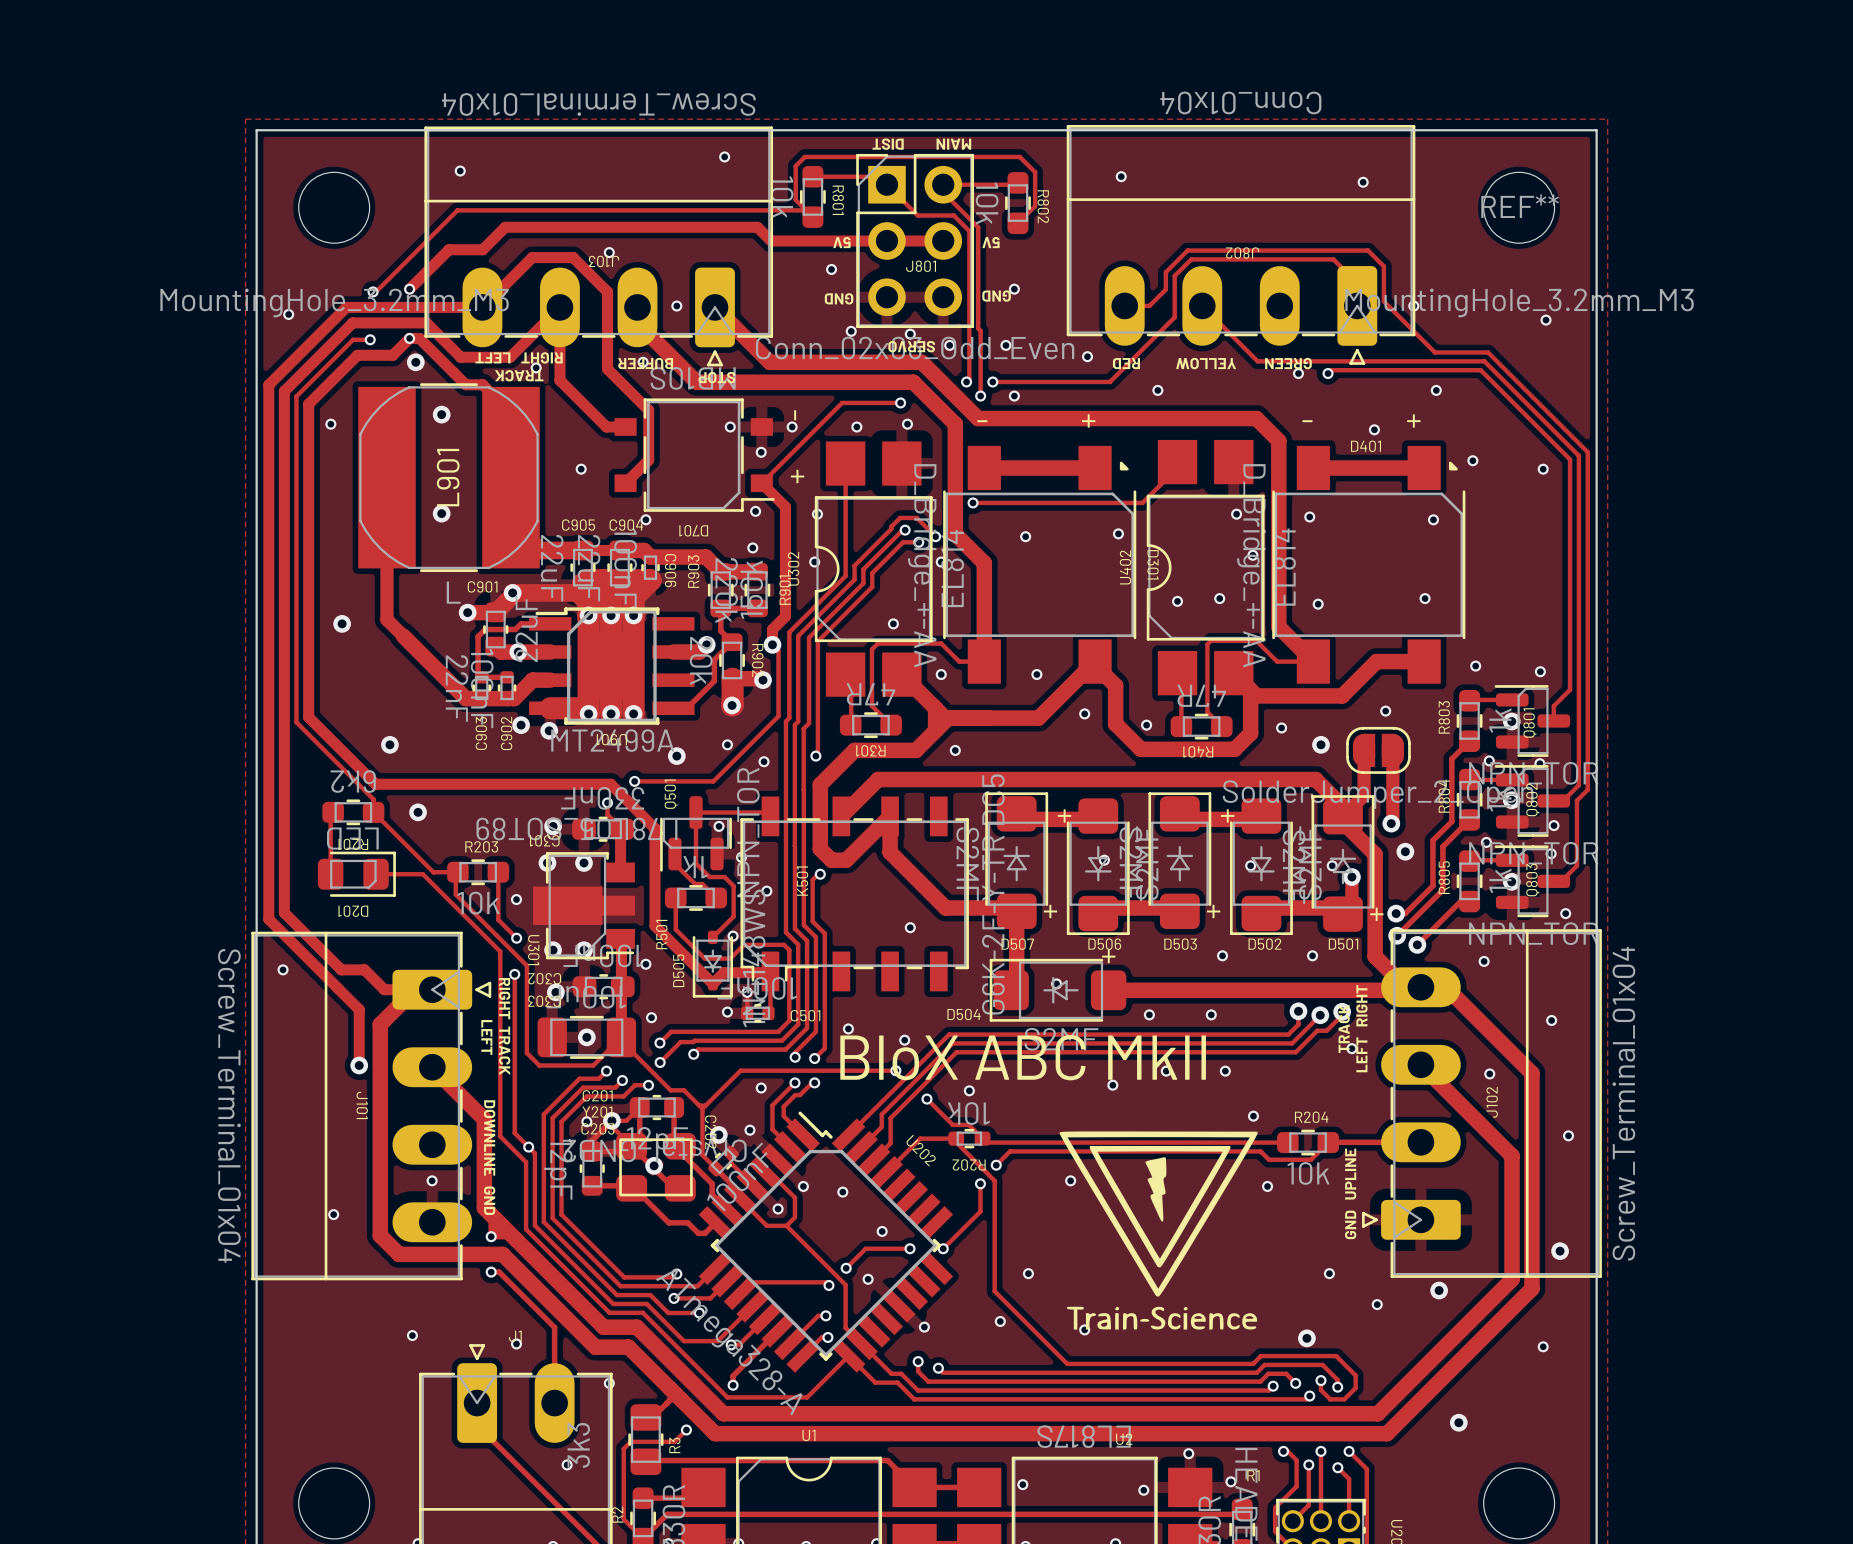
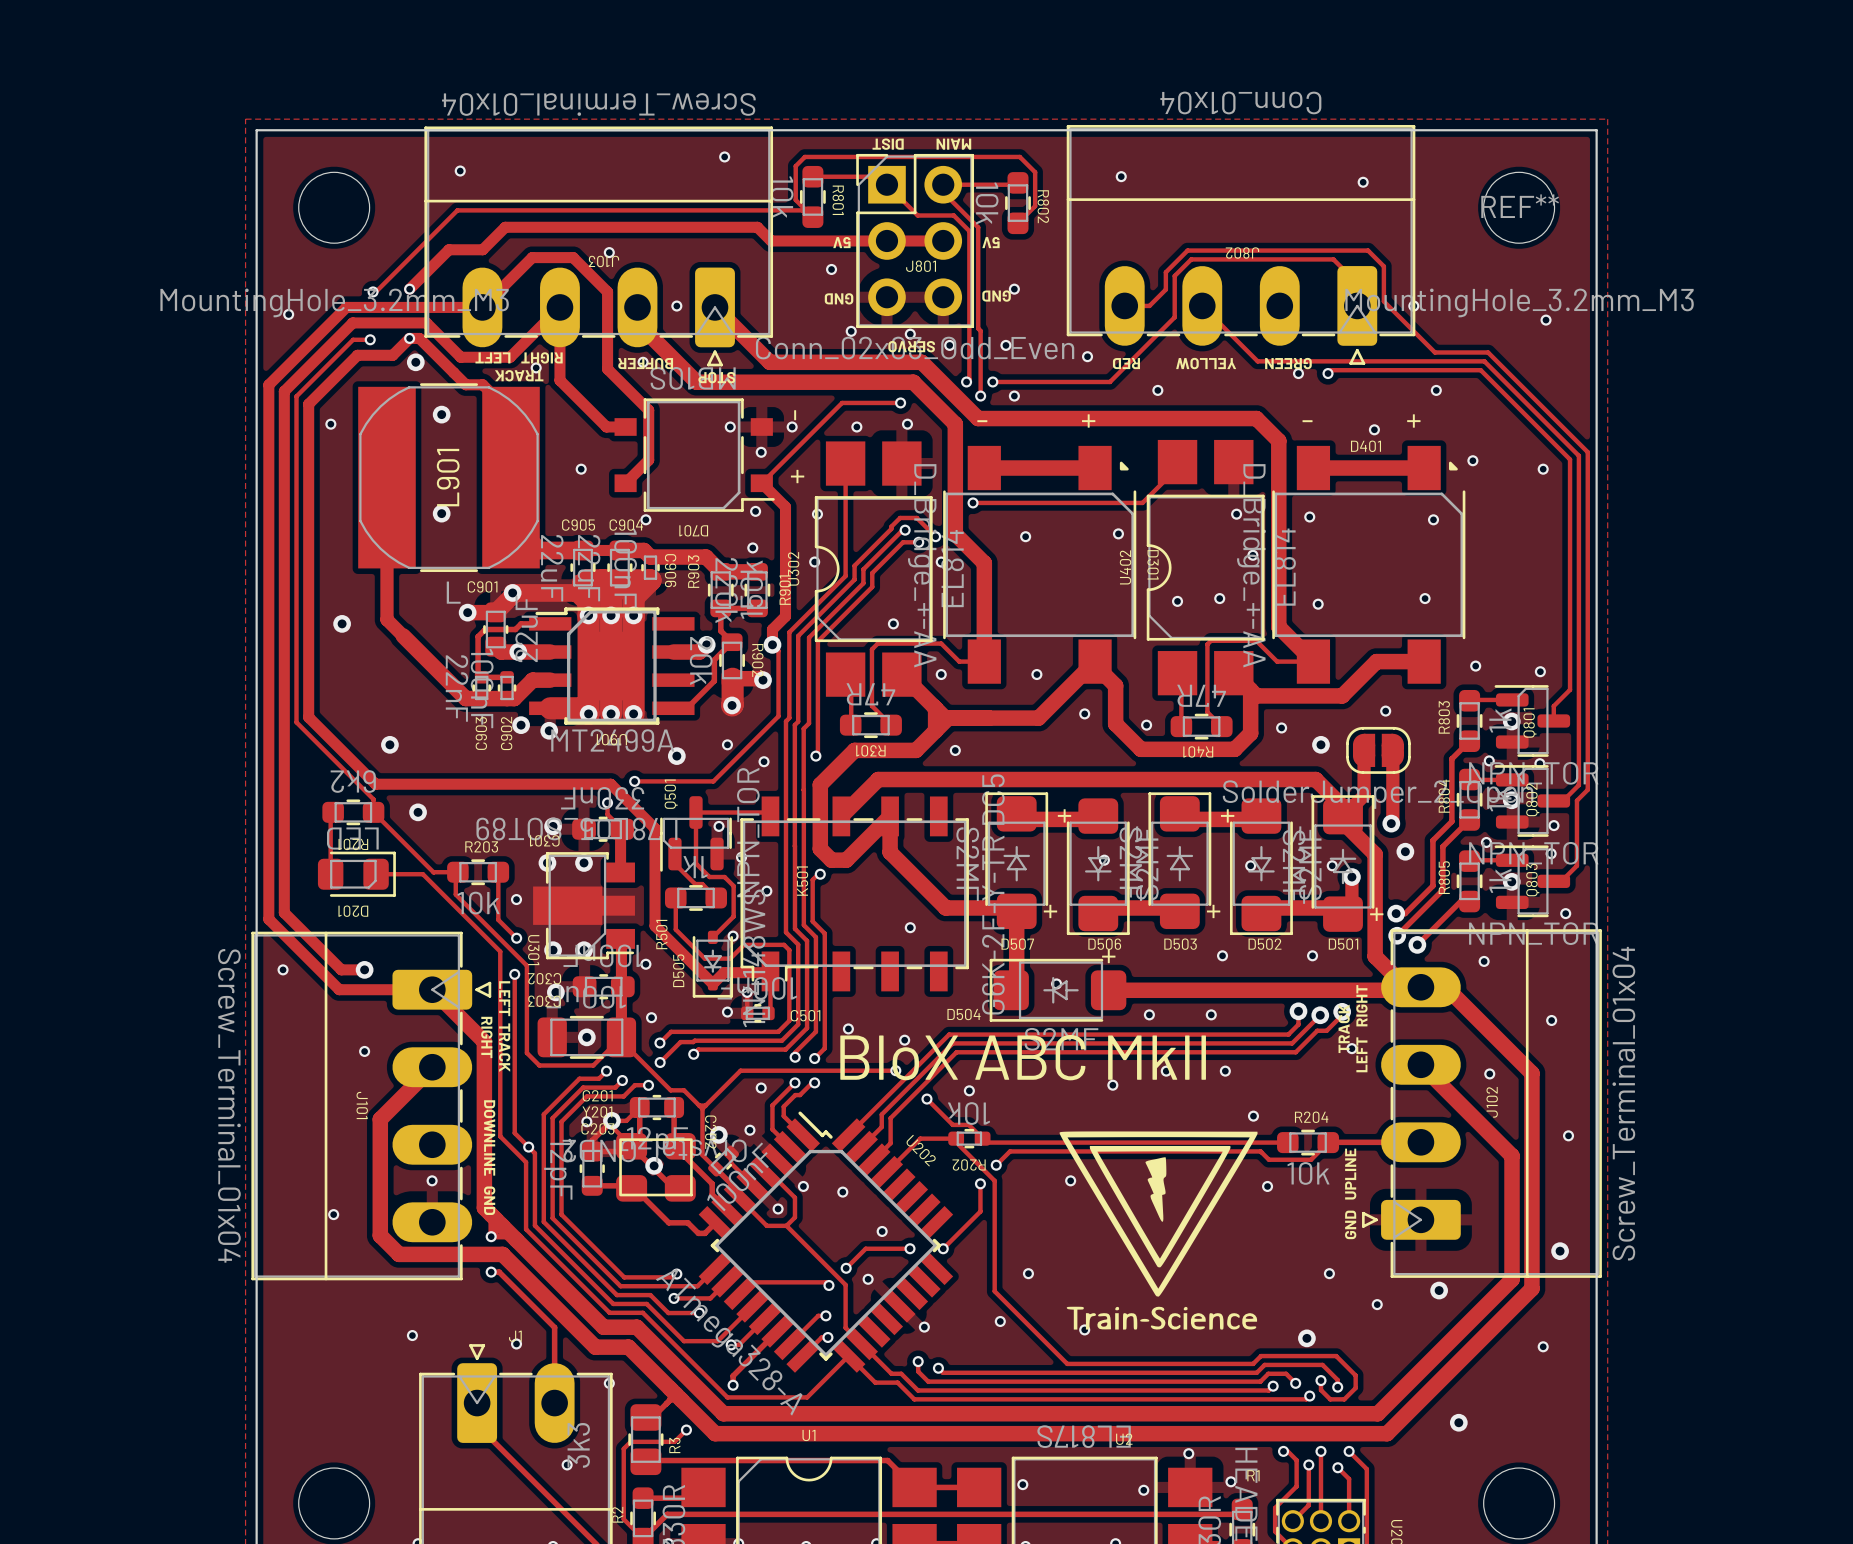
track: (364, 969) (384, 989) -> (339, 989) (384, 989)
track: (339, 989) (359, 1009) (359, 1065) -> none
track: (432, 989) (415, 989) (380, 1024) (380, 1119) -> (432, 1067) (380, 1119)
text: RIGHT TRACK (504, 1026) -> LEFT TRACK (504, 1026)
text: LEFT (486, 1037) -> RIGHT (486, 1037)
via: none -> (364, 1051)
via position: (359, 1065) -> (364, 969)
track: (432, 1067) (484, 1119) -> (432, 989) (484, 1041) (484, 1119)

